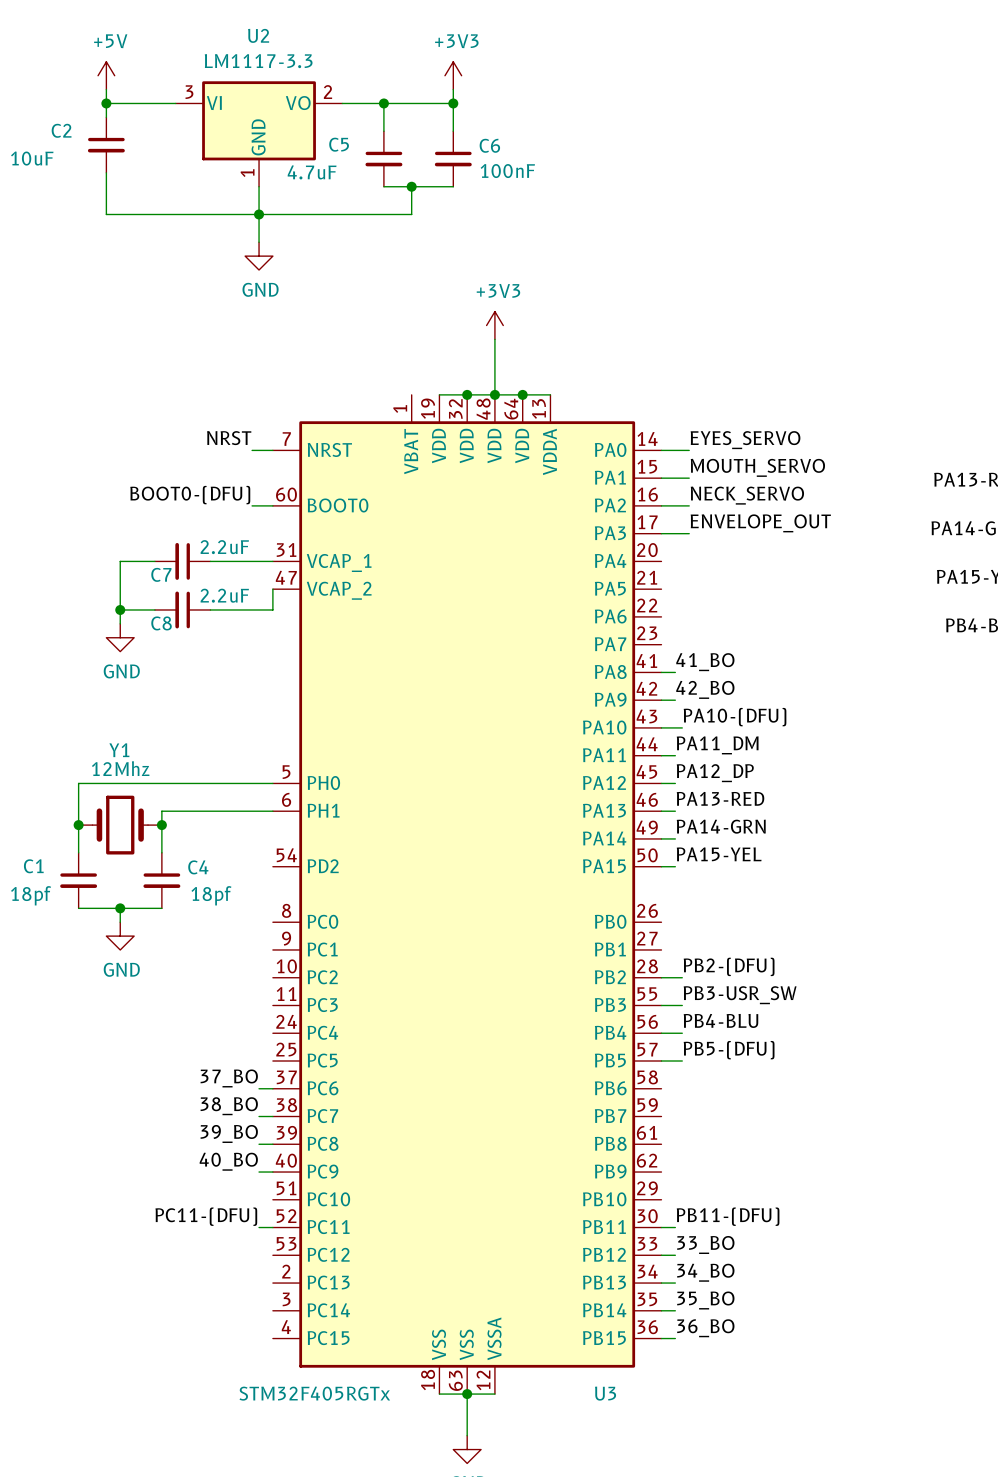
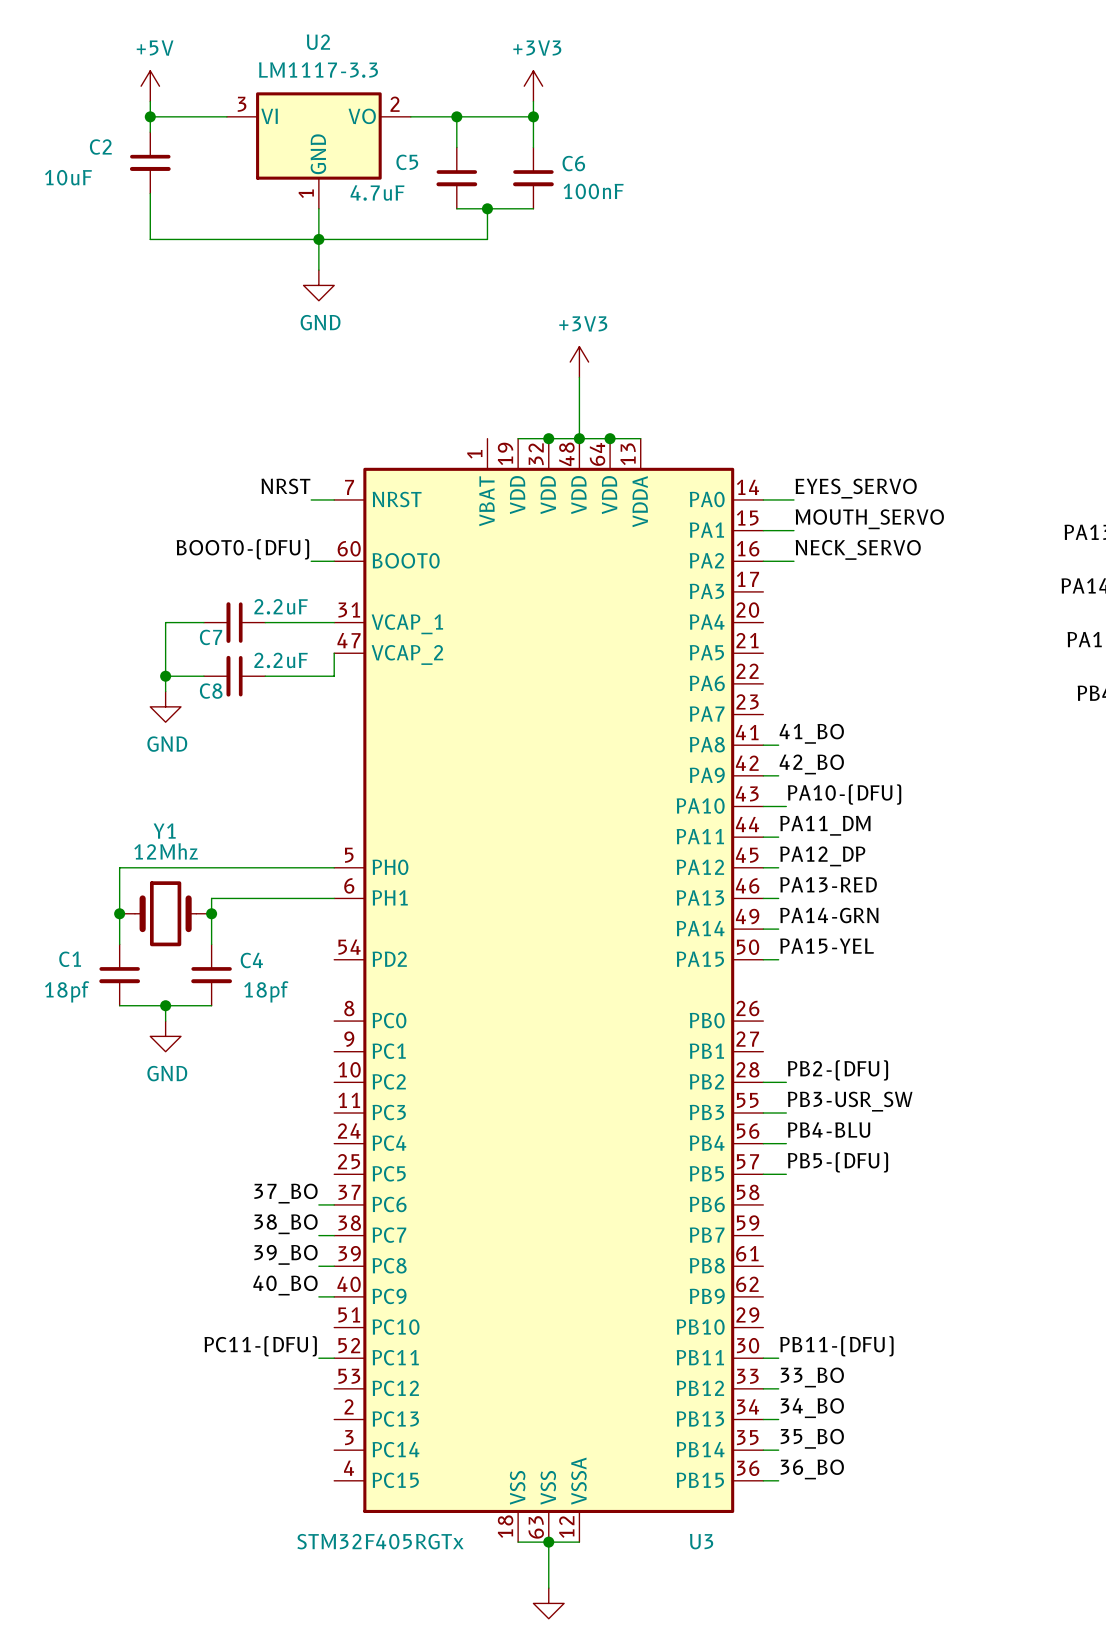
label: ENVELOPE_OUT (760, 523) -> none
wire: (661, 533) (689, 533) -> none

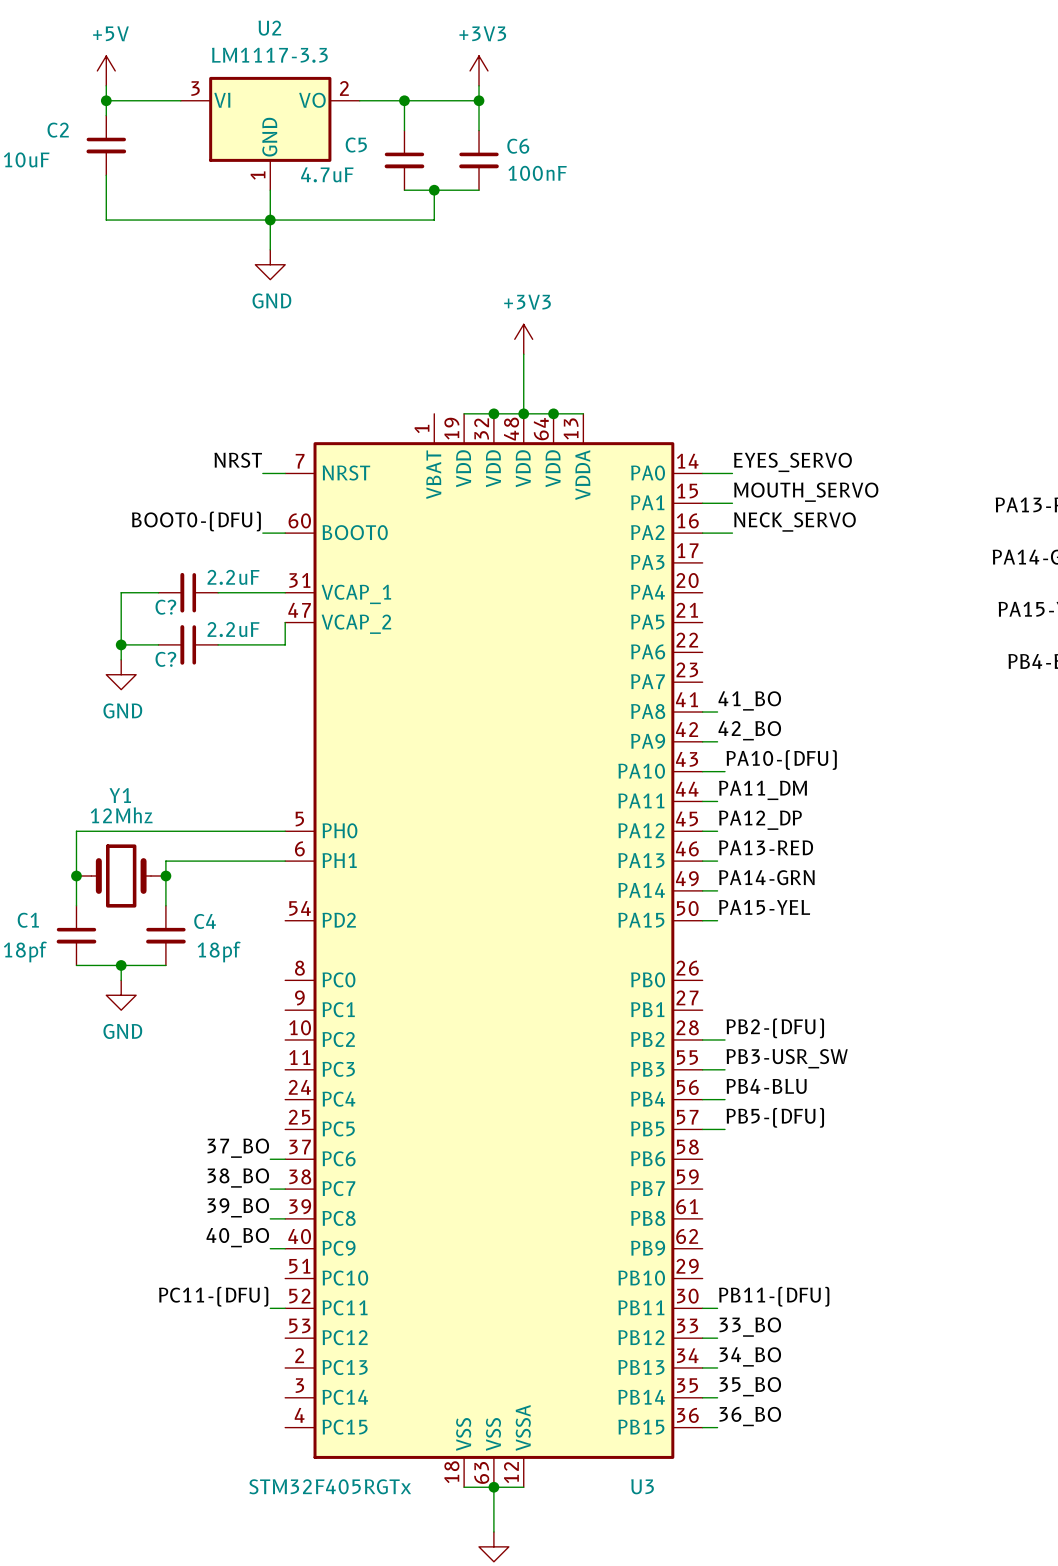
C7 name: C7 (211, 637) -> C? (165, 607)
C8 name: C8 (211, 691) -> C? (165, 659)

